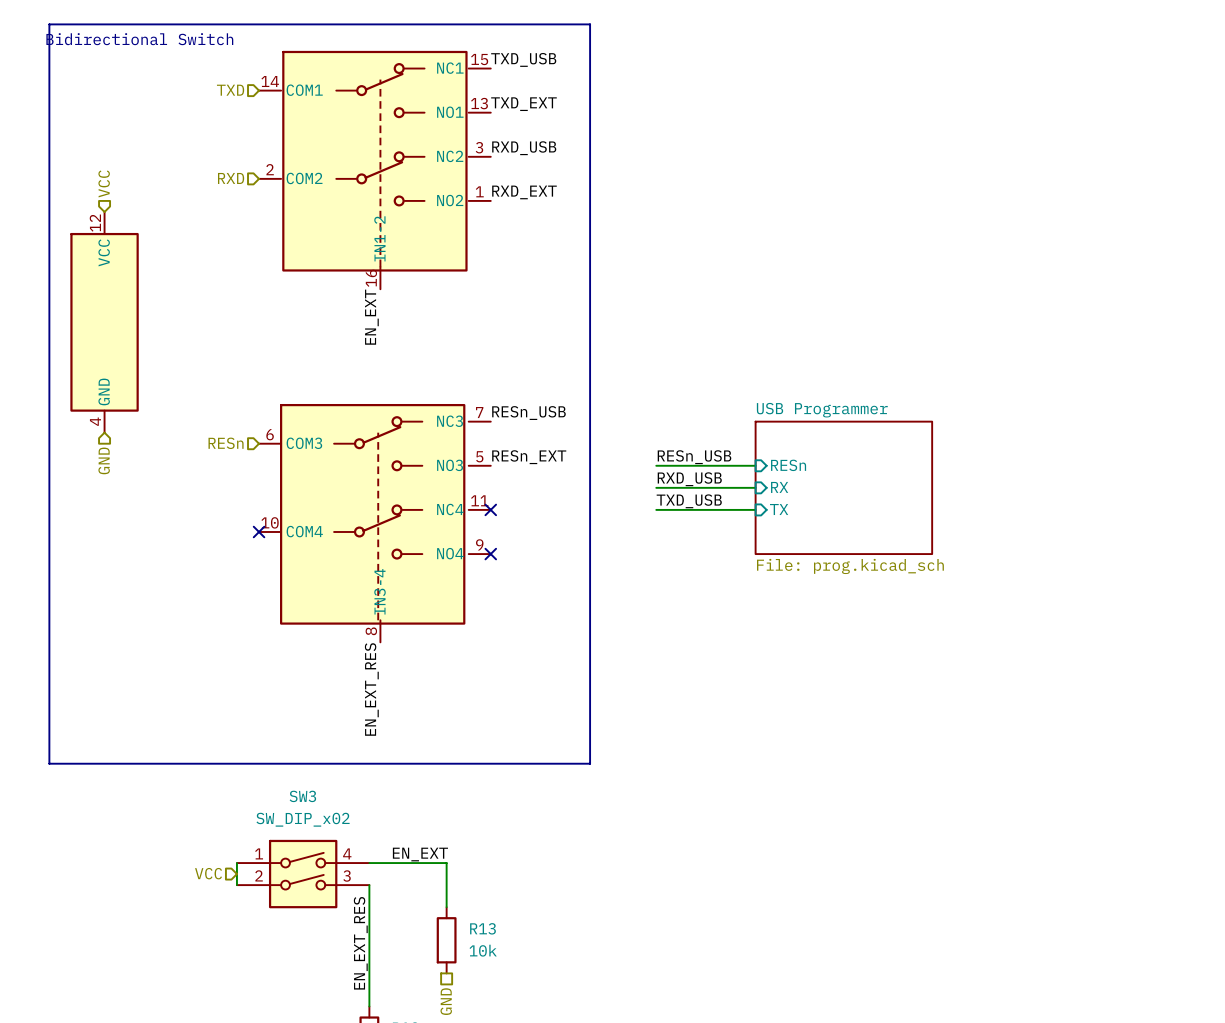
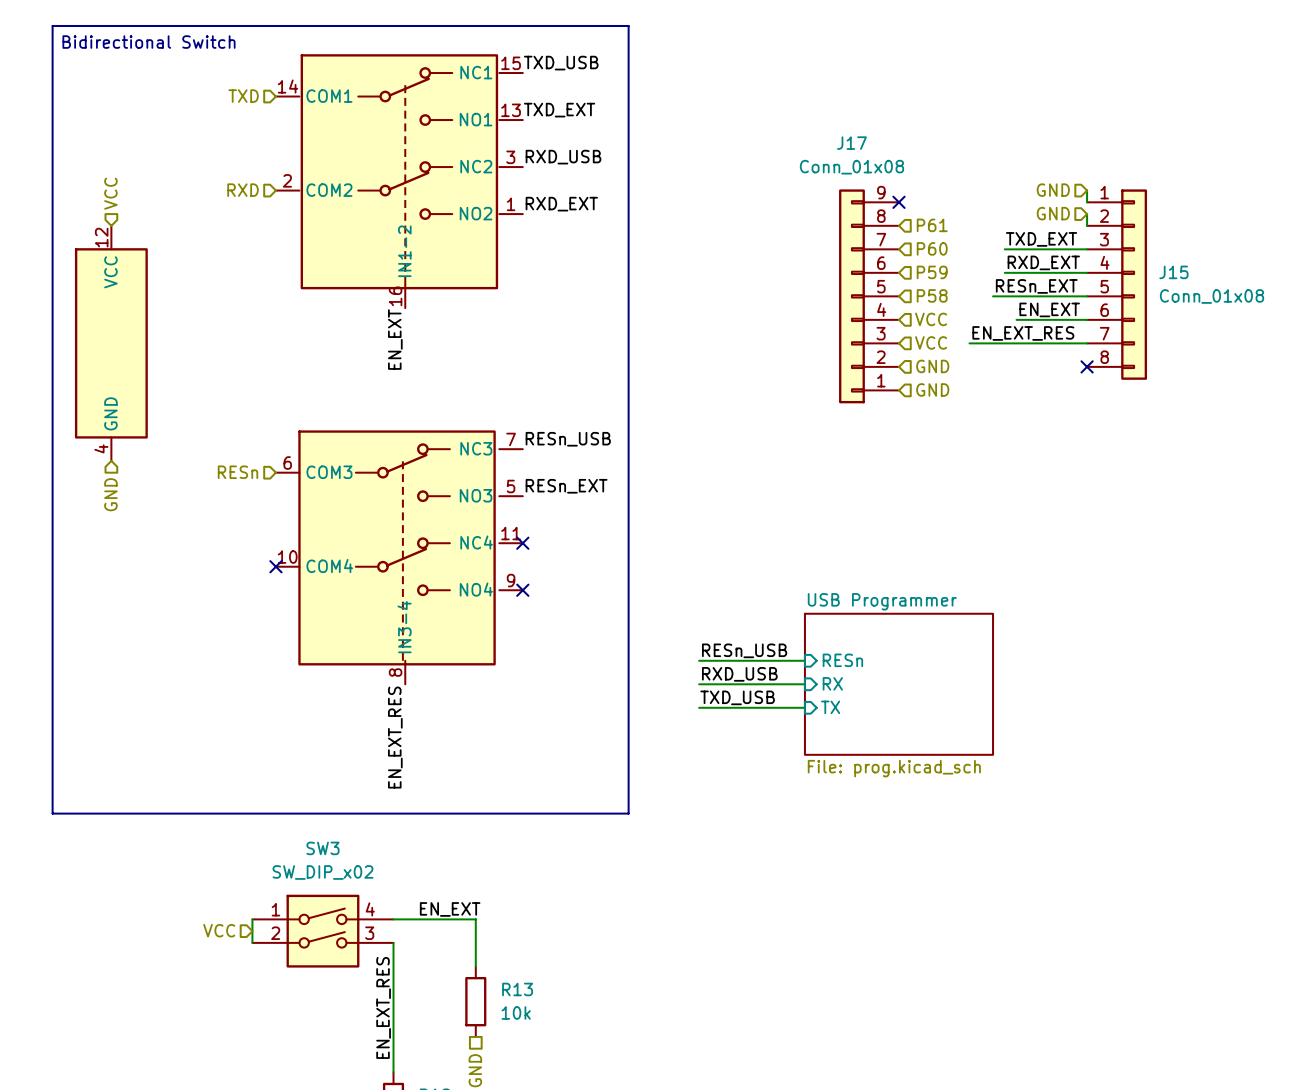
hierarchical label: none -> GND (1053, 190)
wire: none -> (1087, 190) (1087, 202)
no-connect mark: none -> (898, 202)
hierarchical label: none -> GND (1053, 213)
wire: none -> (1087, 214) (1087, 225)
hierarchical label: none -> P61 (932, 225)
label: none -> TXD_EXT (1041, 239)
hierarchical label: none -> P60 (932, 248)
wire: none -> (1004, 249) (1087, 249)
label: none -> RXD_EXT (1043, 262)
hierarchical label: none -> P59 (932, 272)
wire: none -> (1004, 272) (1087, 272)
J15: none -> Conn_01x08 (1117, 284)
label: none -> RESn_EXT (1036, 286)
hierarchical label: none -> P58 (932, 295)
J17: none -> Conn_01x08 (869, 296)
wire: none -> (993, 296) (1087, 296)
label: none -> EN_EXT (1049, 309)
hierarchical label: none -> VCC (931, 319)
wire: none -> (1016, 319) (1087, 319)
label: none -> EN_EXT_RES (1023, 333)
hierarchical label: none -> VCC (931, 342)
wire: none -> (969, 343) (1087, 343)
hierarchical label: none -> GND (932, 366)
no-connect mark: none -> (1087, 366)
hierarchical label: none -> GND (932, 389)
label position: RESn_USB (694, 457) -> RESn_USB (744, 650)
wire: (656, 465) (755, 465) -> (699, 660) (804, 660)
sheet pin position: RESn (788, 465) -> RESn (842, 660)
label position: RXD_USB (689, 479) -> RXD_USB (739, 674)
wire: (656, 487) (755, 487) -> (699, 684) (804, 684)
sheet pin position: RX (779, 487) -> RX (832, 683)
sheet USB Programmer position: (843, 487) -> (898, 684)
label position: TXD_USB (689, 501) -> TXD_USB (737, 697)
wire: (656, 509) (755, 509) -> (699, 707) (804, 707)
sheet pin position: TX (779, 509) -> TX (830, 707)

